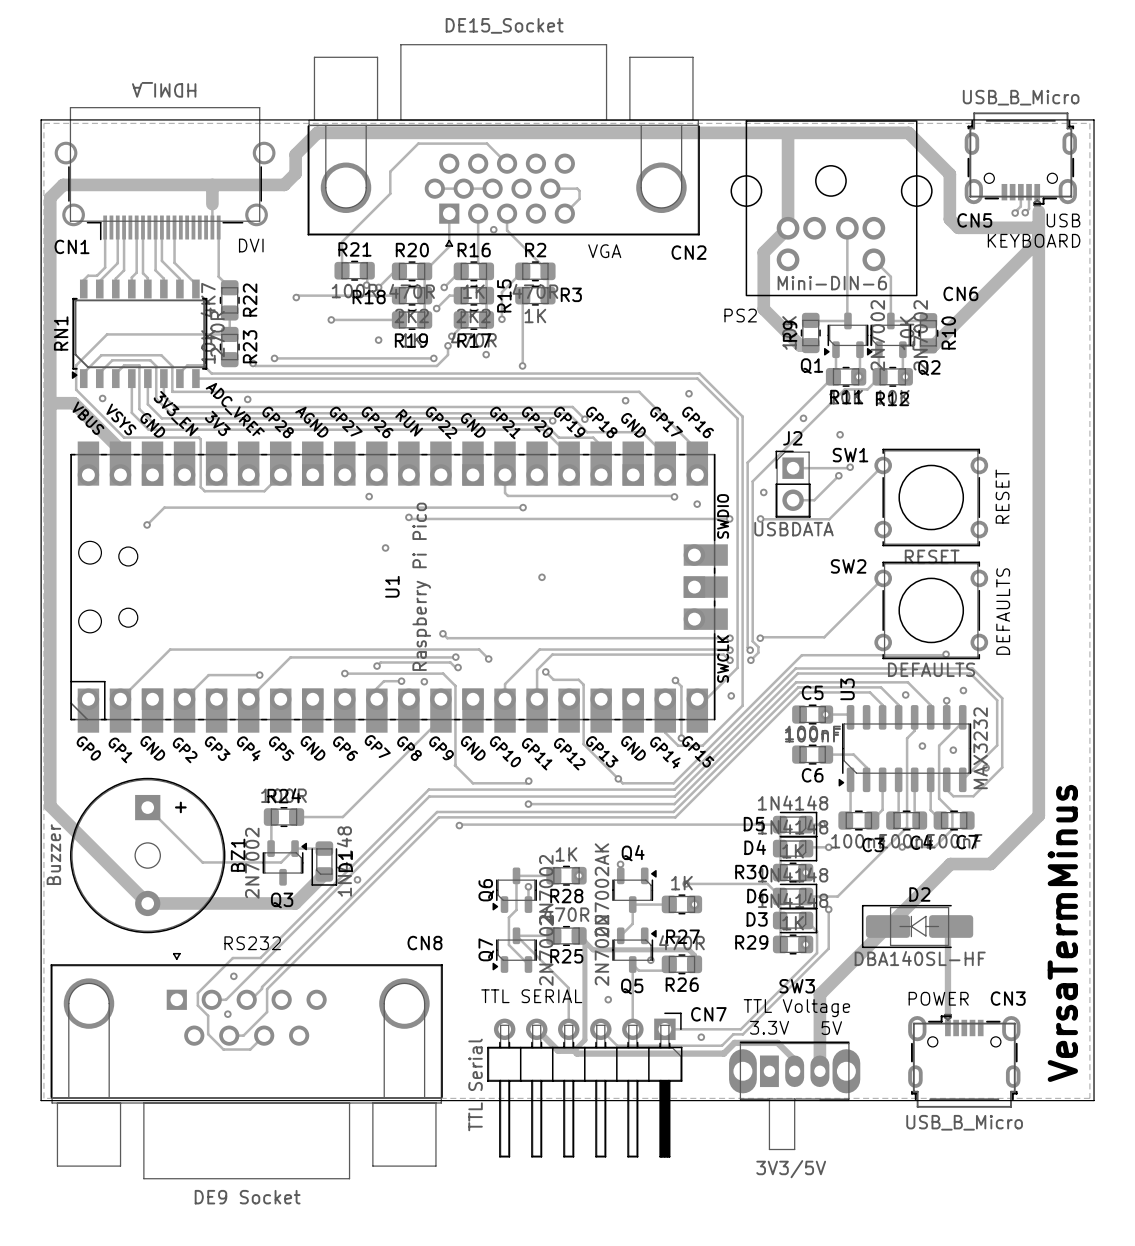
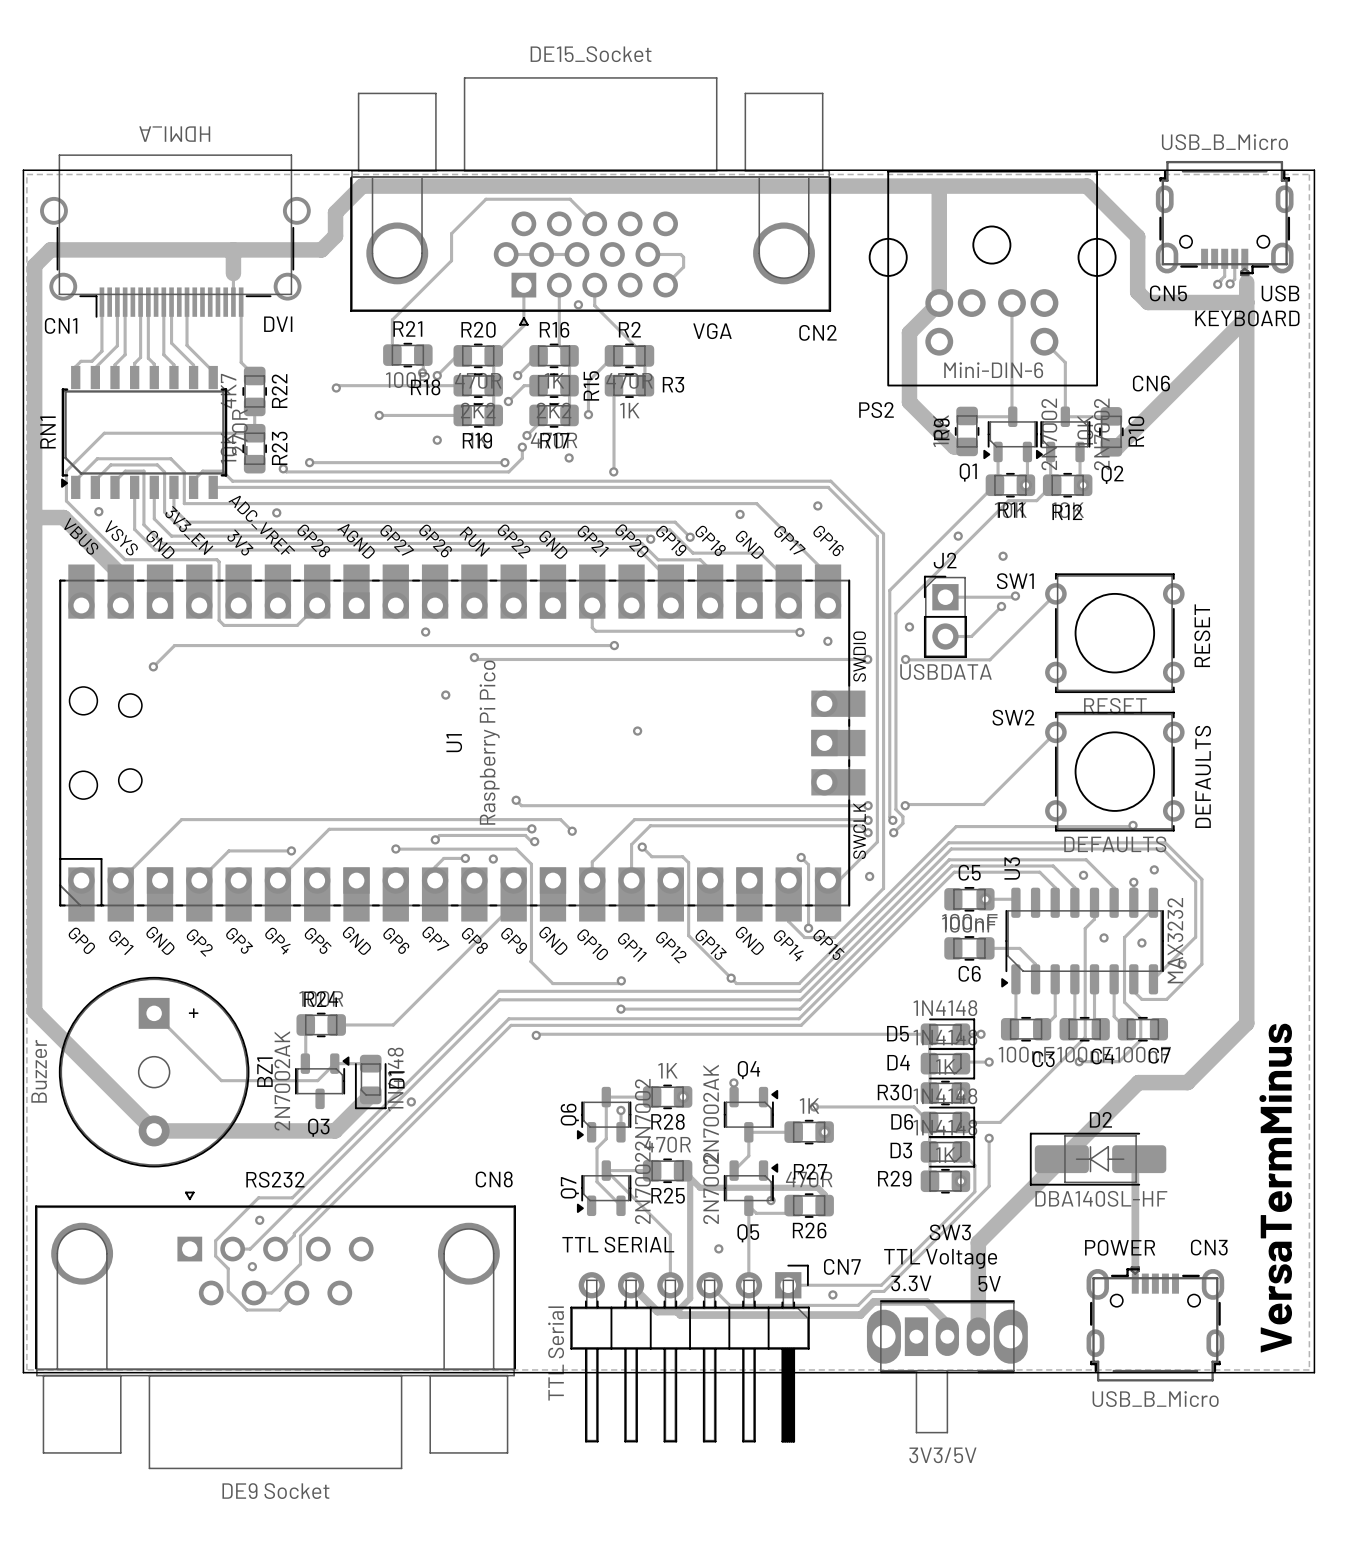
Q3 value: 2N7002 (252, 863) -> 2N7002AK (282, 1080)

